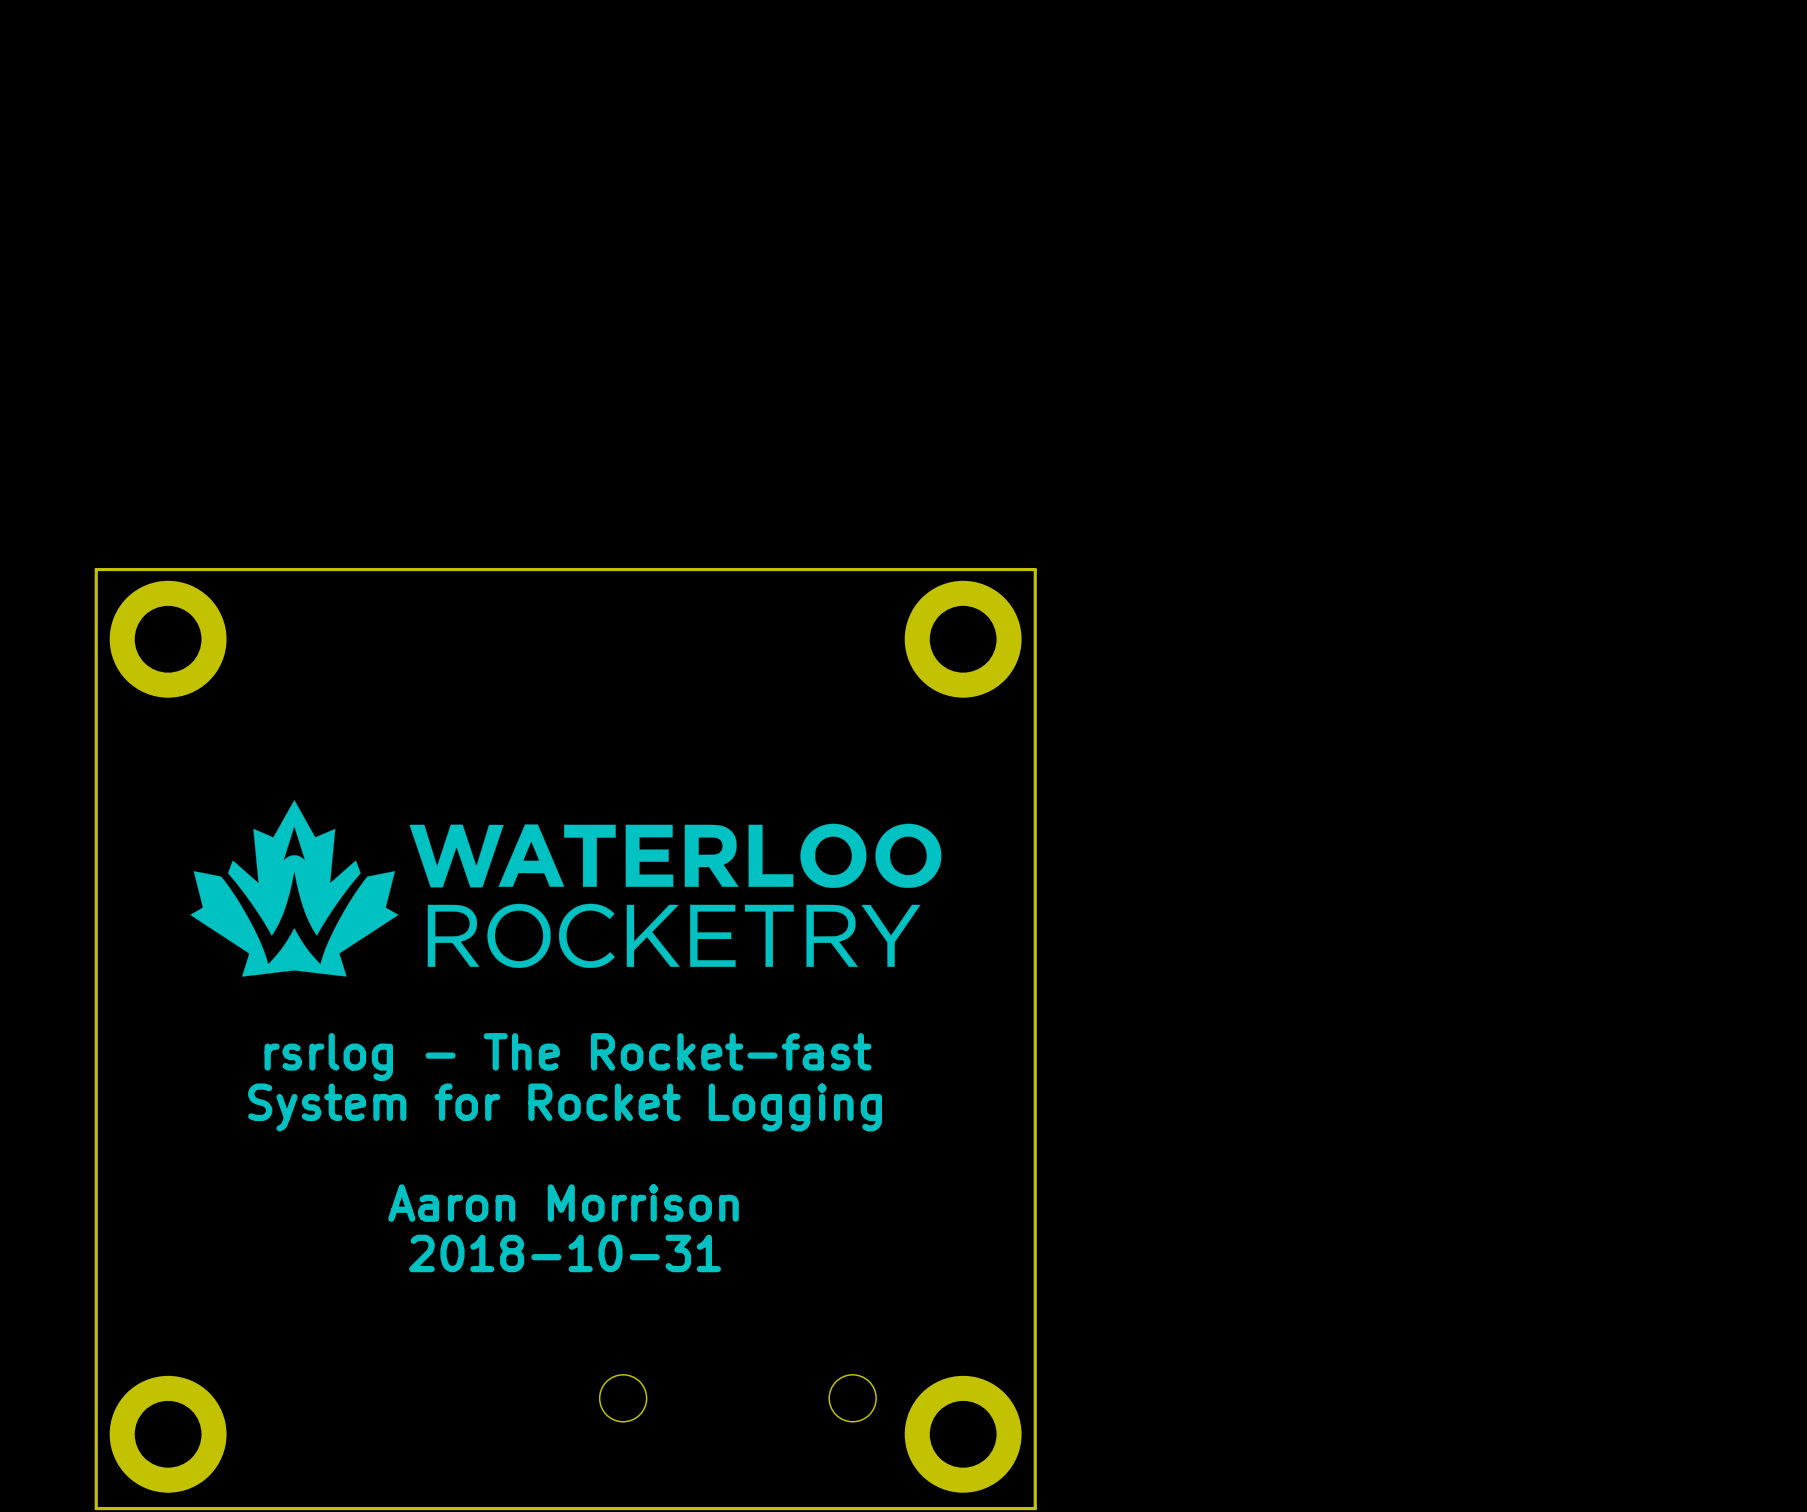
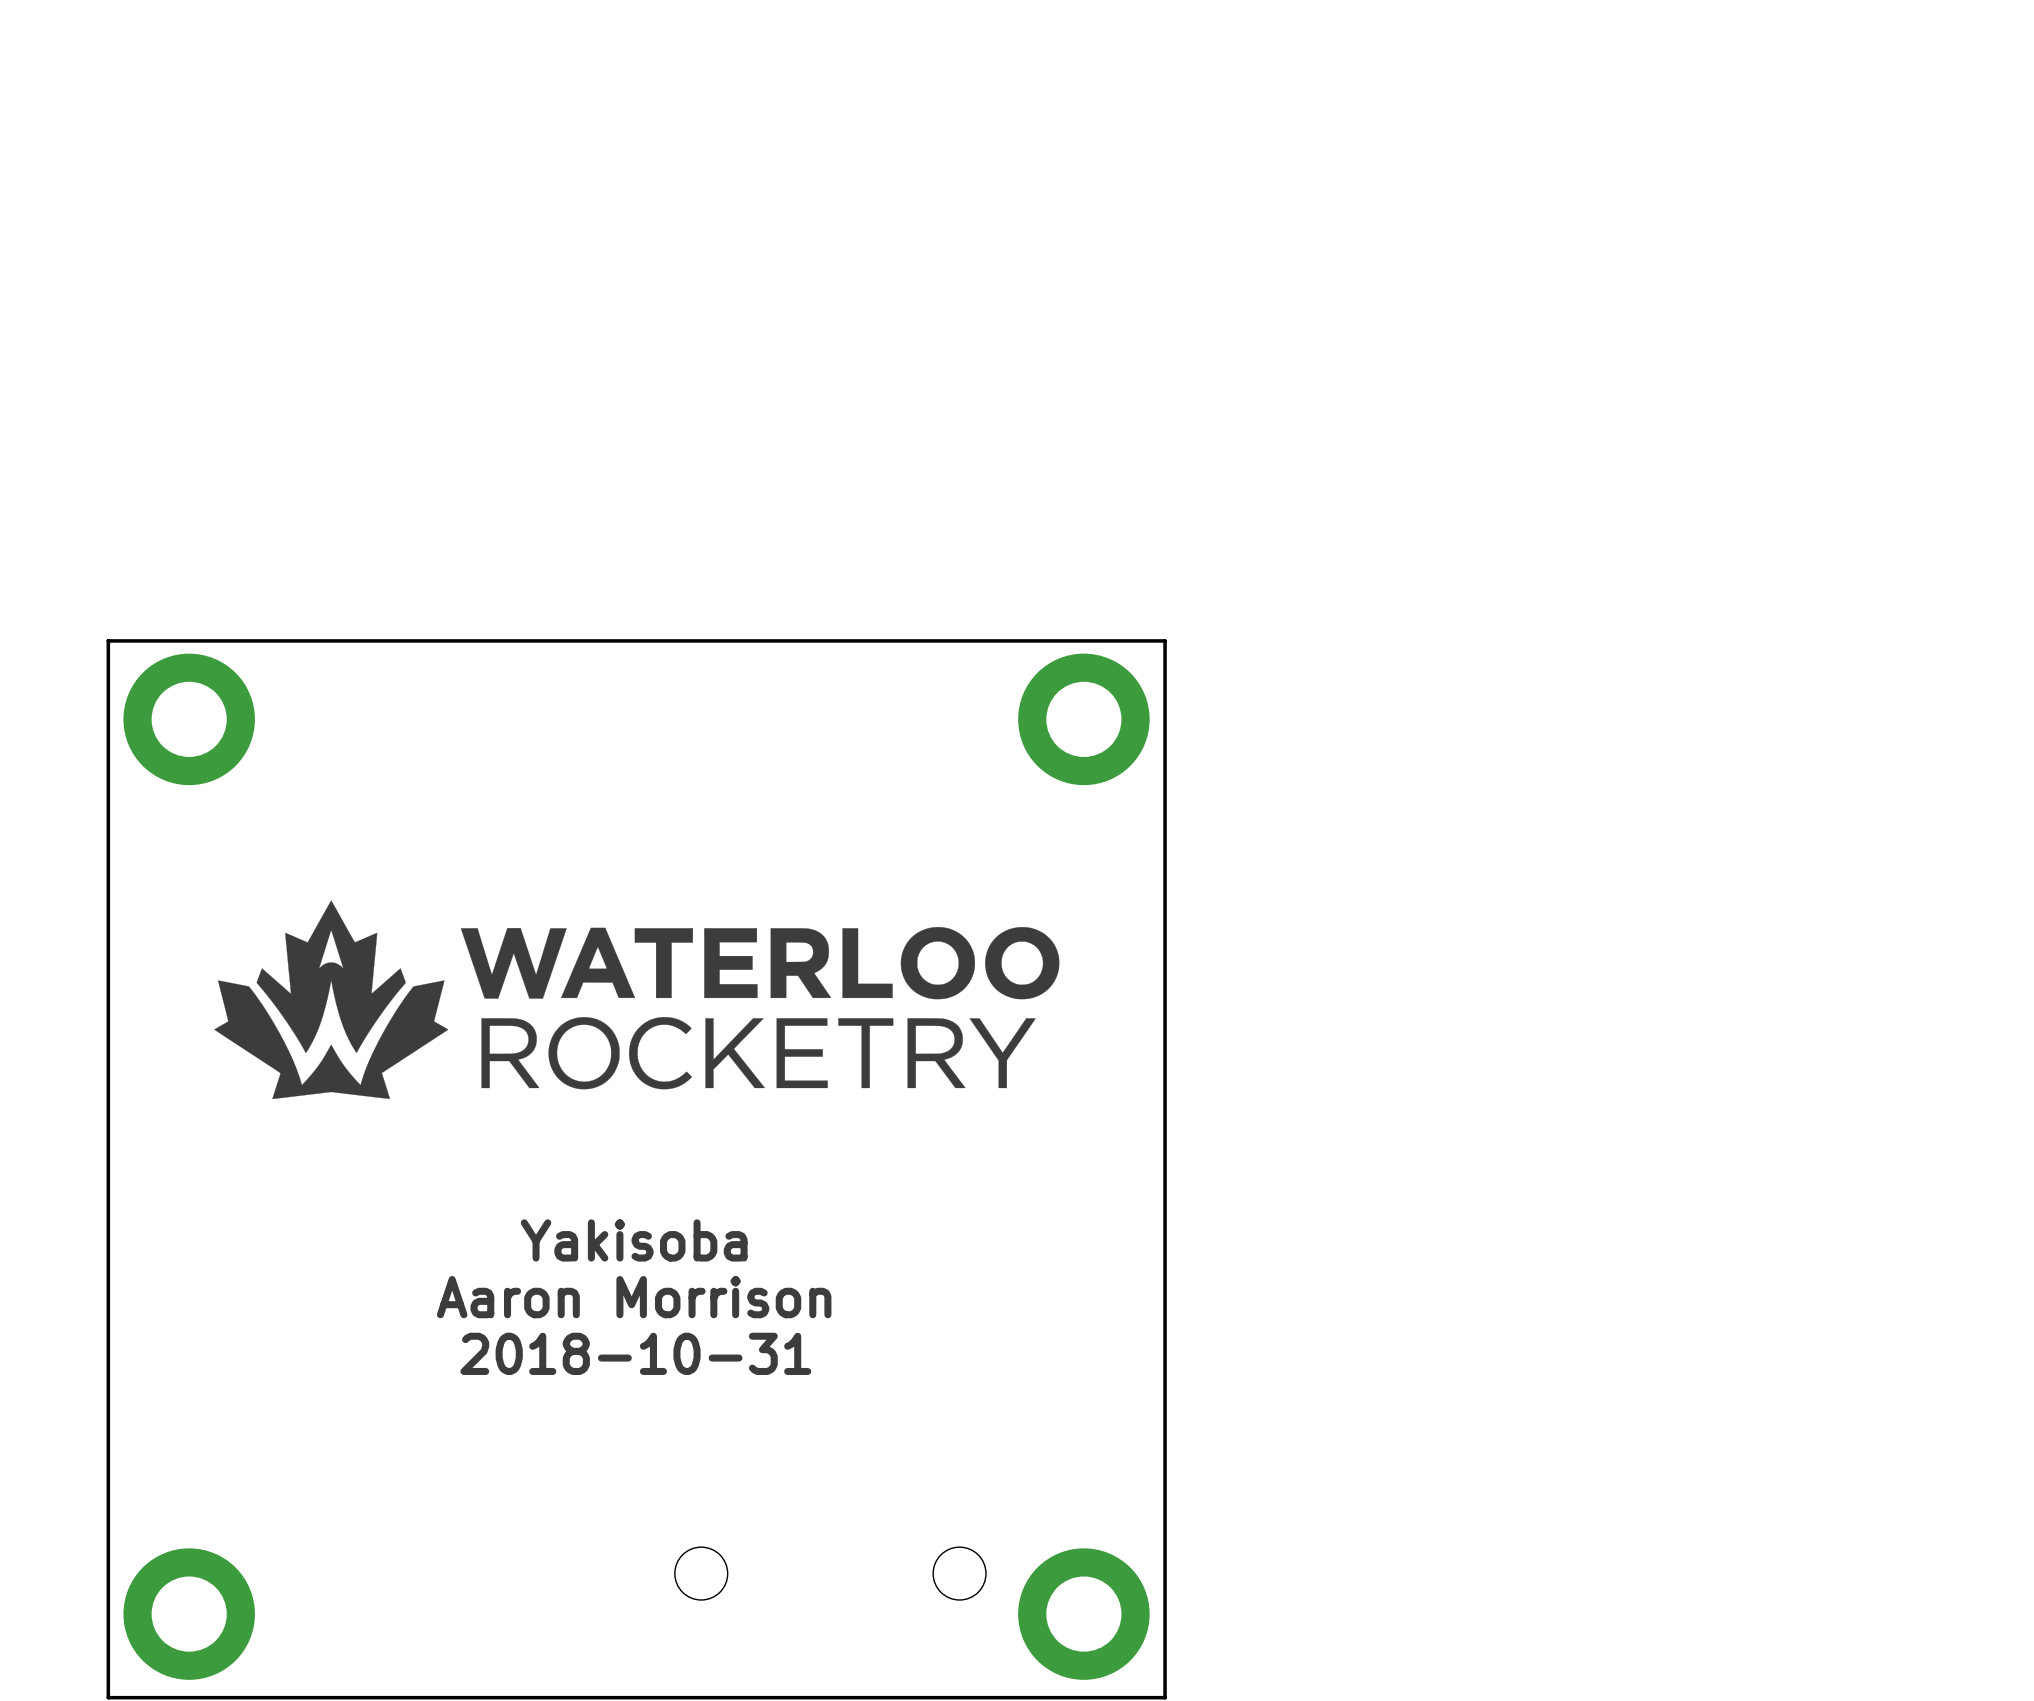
text: rsrlog - The Rocket-fast (567, 1057) -> none
text: System for Rocket Logging (565, 1107) -> Yakisoba (634, 1240)
text: none -> Aaron Morrison (634, 1297)
text: Aaron Morrison (563, 1203) -> 2018-10-31 (635, 1353)
text: 2018-10-31 (565, 1253) -> none

